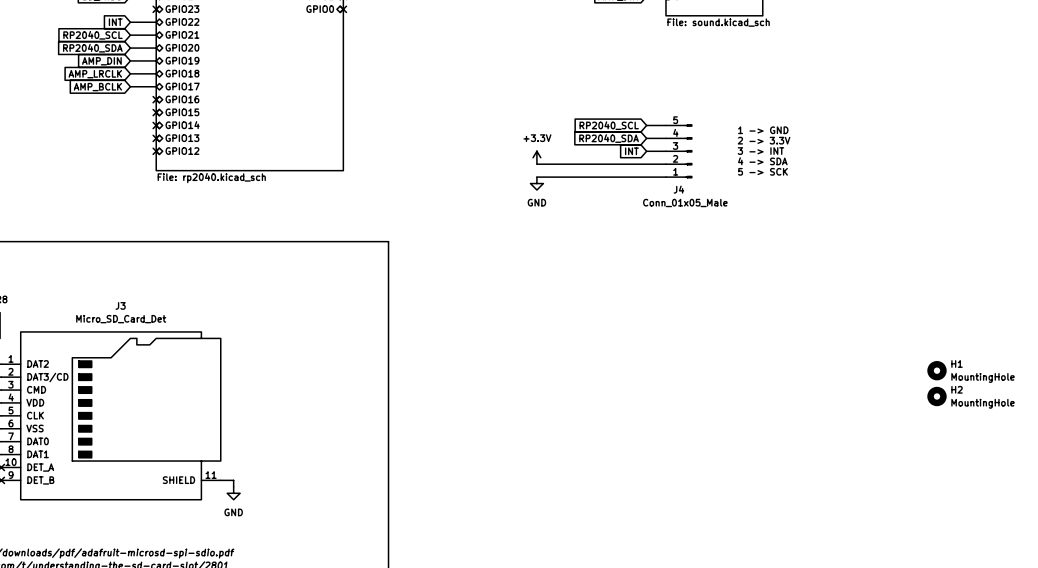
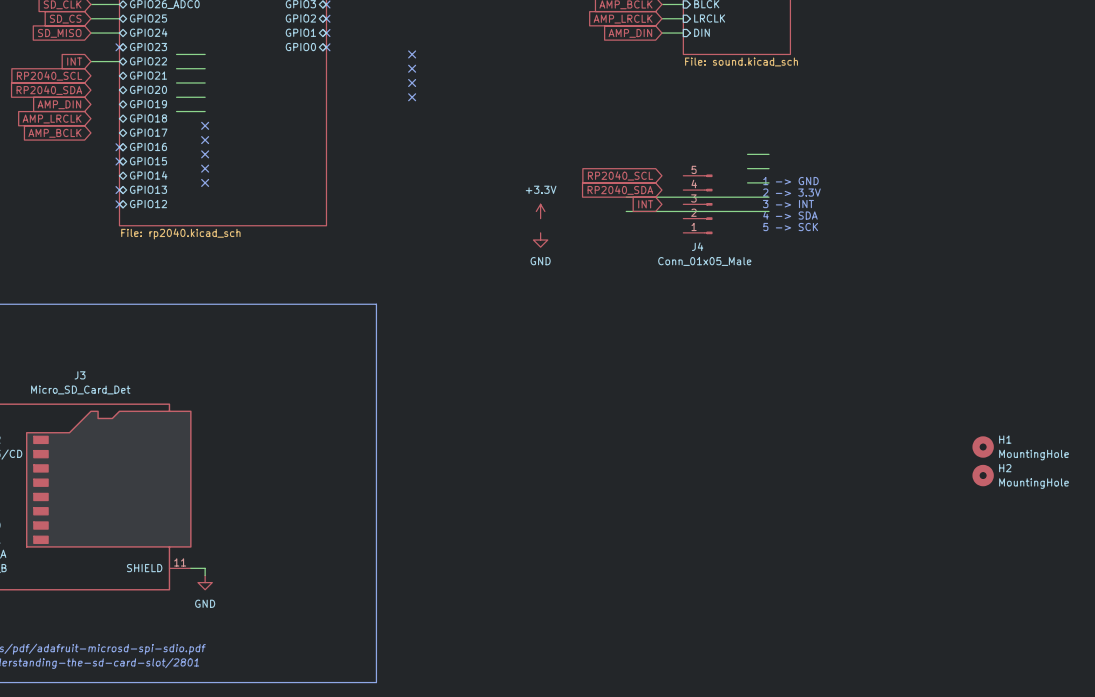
no-connect mark: none -> (412, 54)
no-connect mark: none -> (412, 68)
wire: (130, 35) (156, 35) -> (176, 54) (205, 54)
no-connect mark: none -> (412, 82)
wire: (130, 48) (156, 48) -> (176, 68) (205, 68)
no-connect mark: none -> (412, 97)
wire: (130, 60) (156, 60) -> (176, 82) (205, 82)
wire: (130, 73) (156, 73) -> (176, 97) (205, 97)
no-connect mark: none -> (205, 125)
wire: (130, 86) (156, 86) -> (176, 111) (205, 111)
no-connect mark: none -> (205, 140)
no-connect mark: none -> (205, 154)
no-connect mark: none -> (205, 168)
no-connect mark: (156, 125) -> none
wire: (646, 125) (665, 125) -> (747, 154) (769, 154)
no-connect mark: none -> (205, 182)
wire: (646, 138) (665, 138) -> (747, 168) (769, 168)
wire: (646, 151) (665, 151) -> (747, 182) (769, 182)
wire: (536, 164) (665, 164) -> (626, 197) (769, 197)
wire: (536, 177) (665, 177) -> (626, 211) (769, 211)

